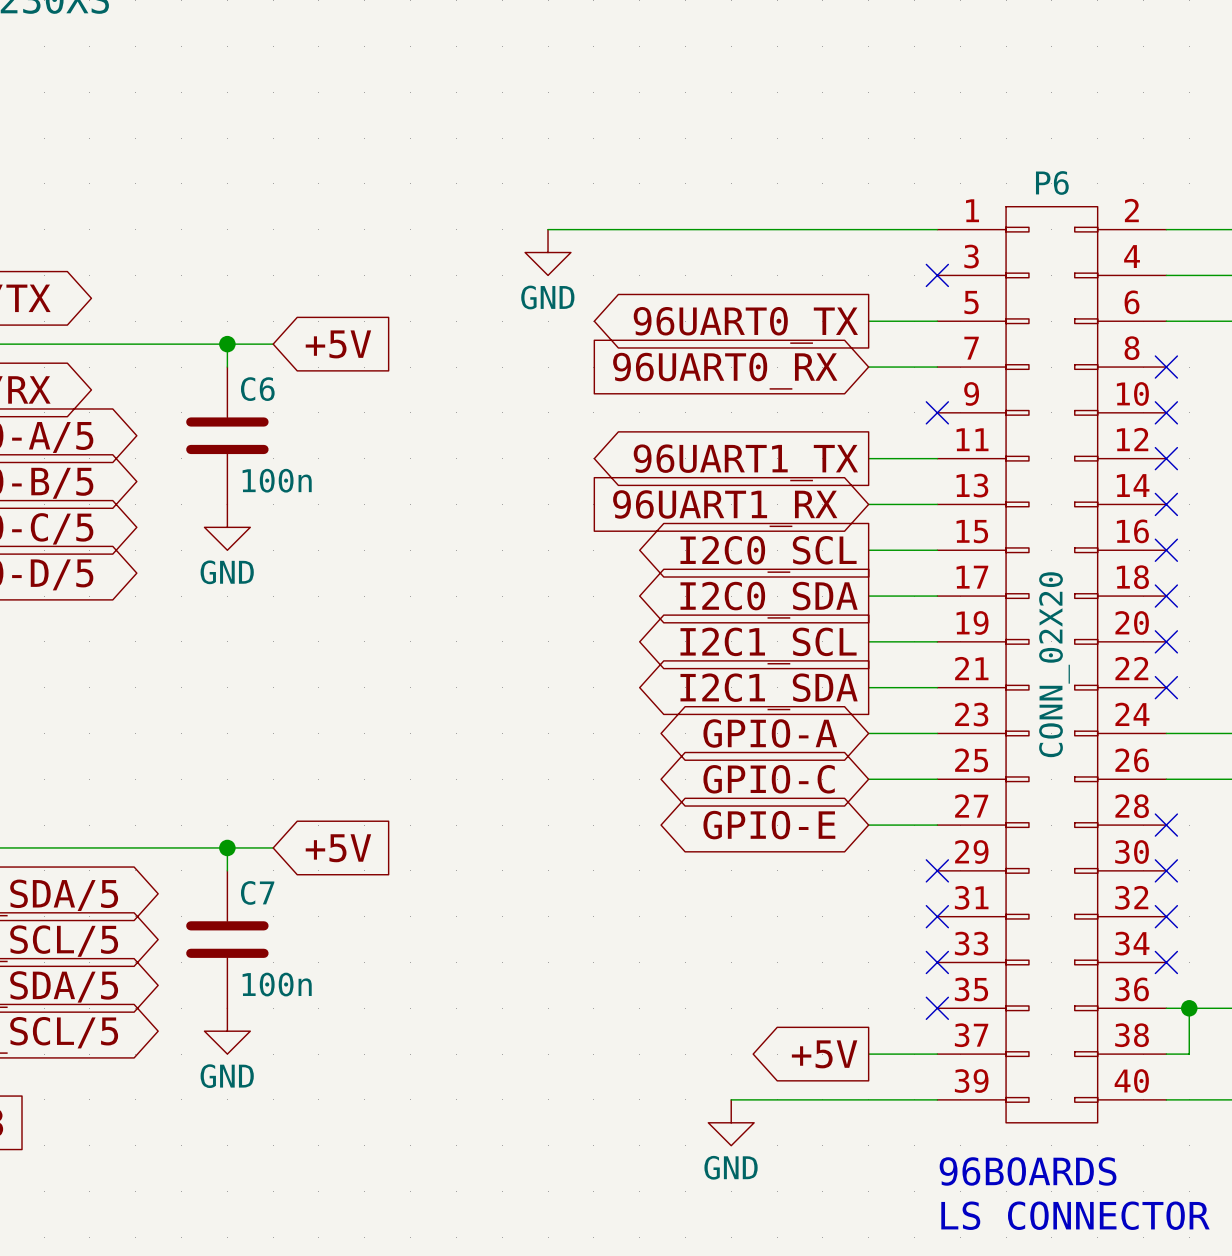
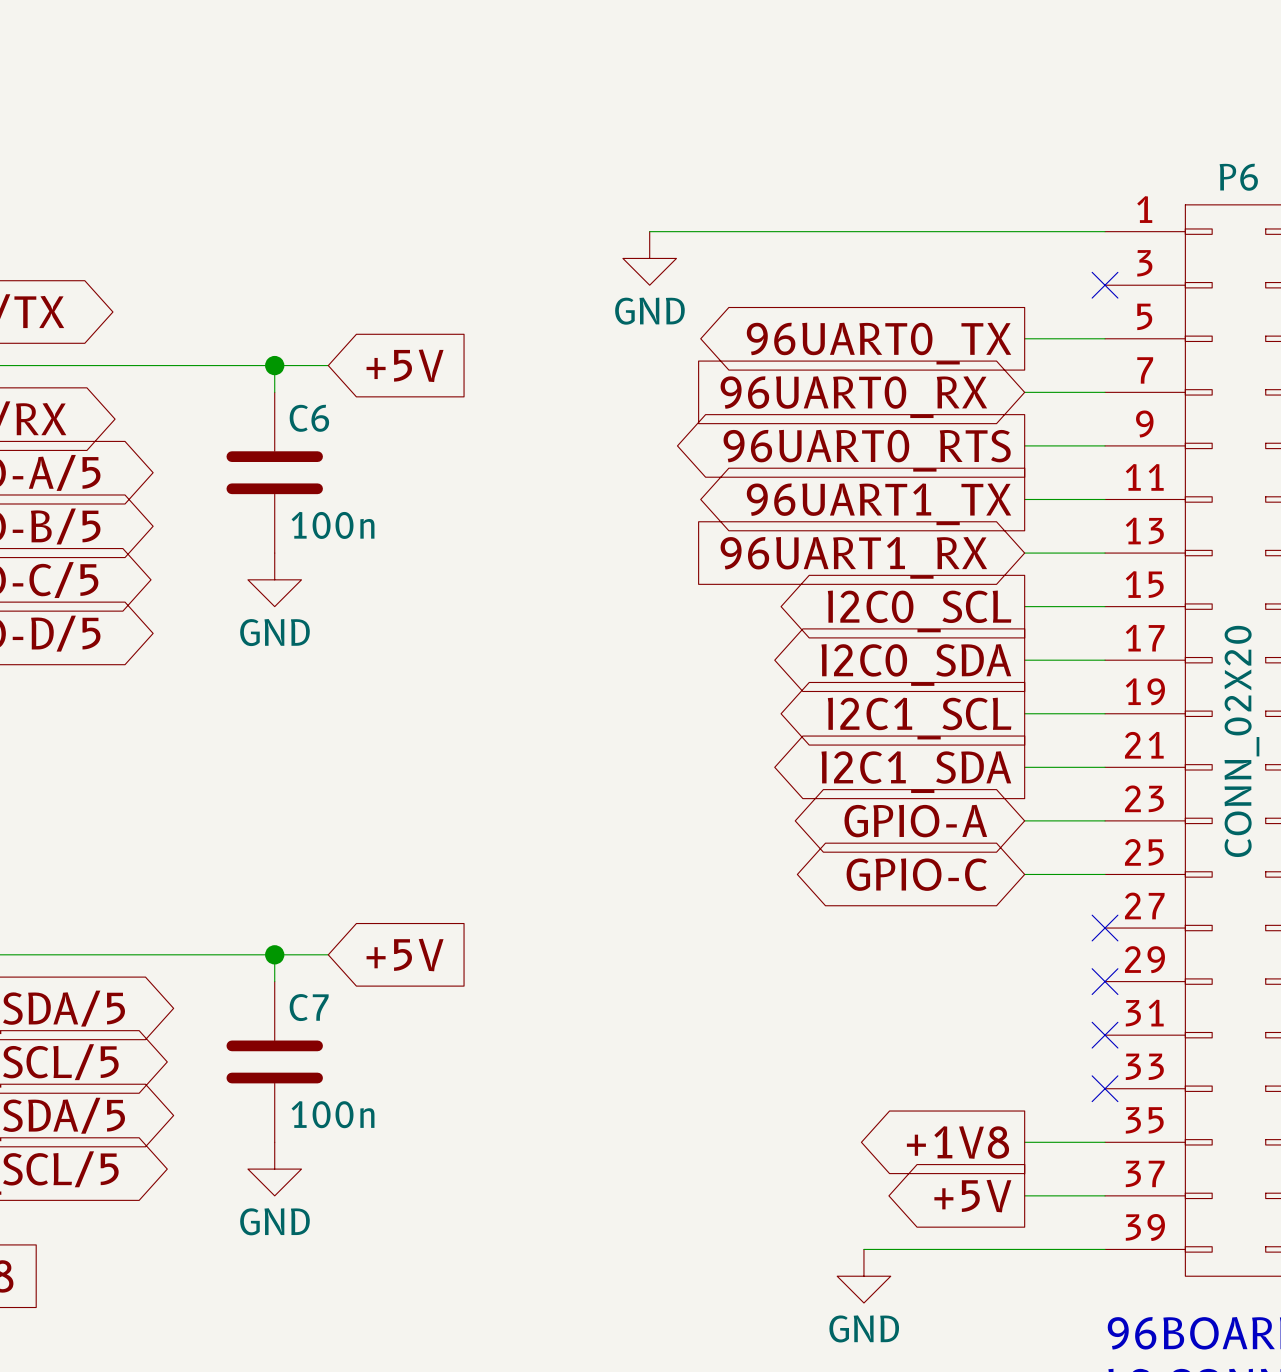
wire: none -> (1024, 445) (1105, 445)
no-connect mark: (937, 412) -> none
global label: none -> 96UART0_RTS (867, 450)
global label: GPIO-E (769, 825) -> none
wire: (868, 825) (937, 825) -> (1024, 1142) (1105, 1142)
no-connect mark: none -> (1105, 928)
global label: none -> +1V8 (957, 1142)
no-connect mark: (937, 1008) -> none

